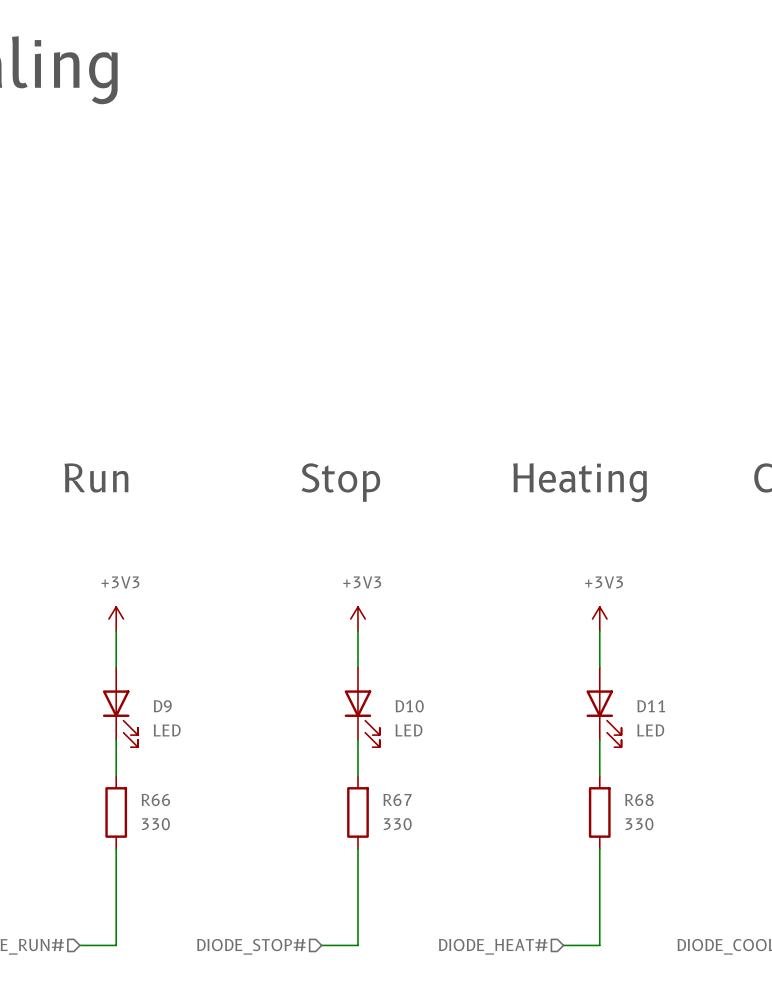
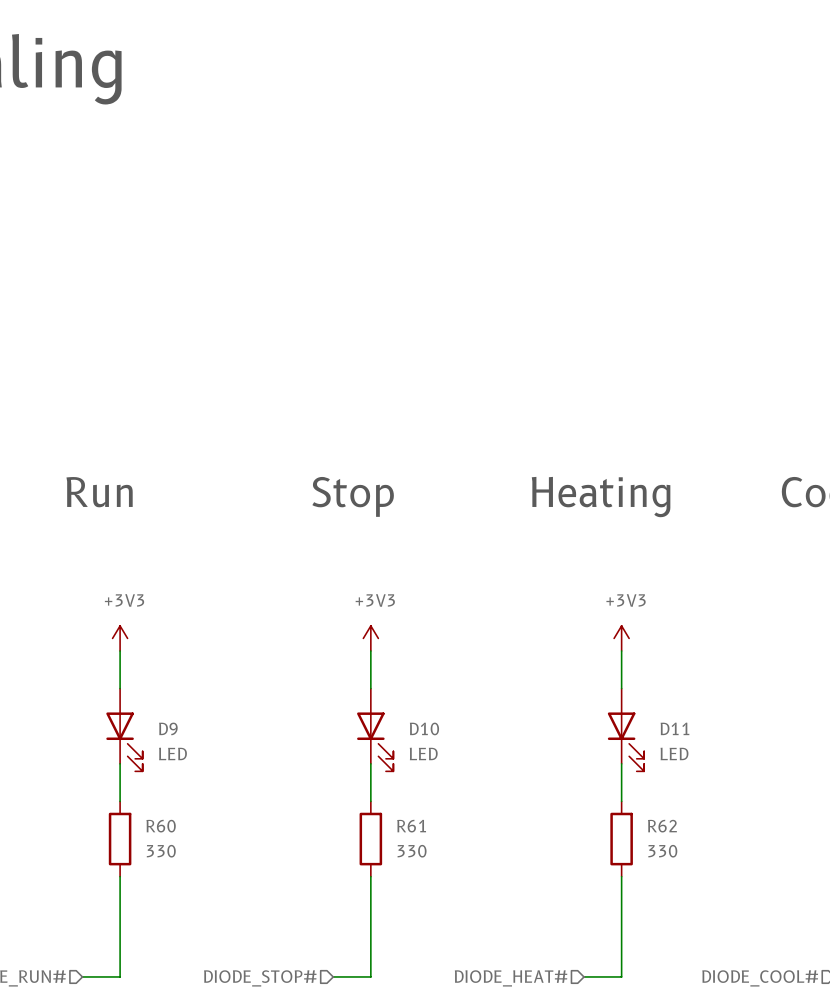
R66 name: R66 (155, 800) -> R60 (161, 826)
R67 name: R67 (397, 800) -> R61 (411, 826)
R68 name: R68 (639, 800) -> R62 (662, 826)

